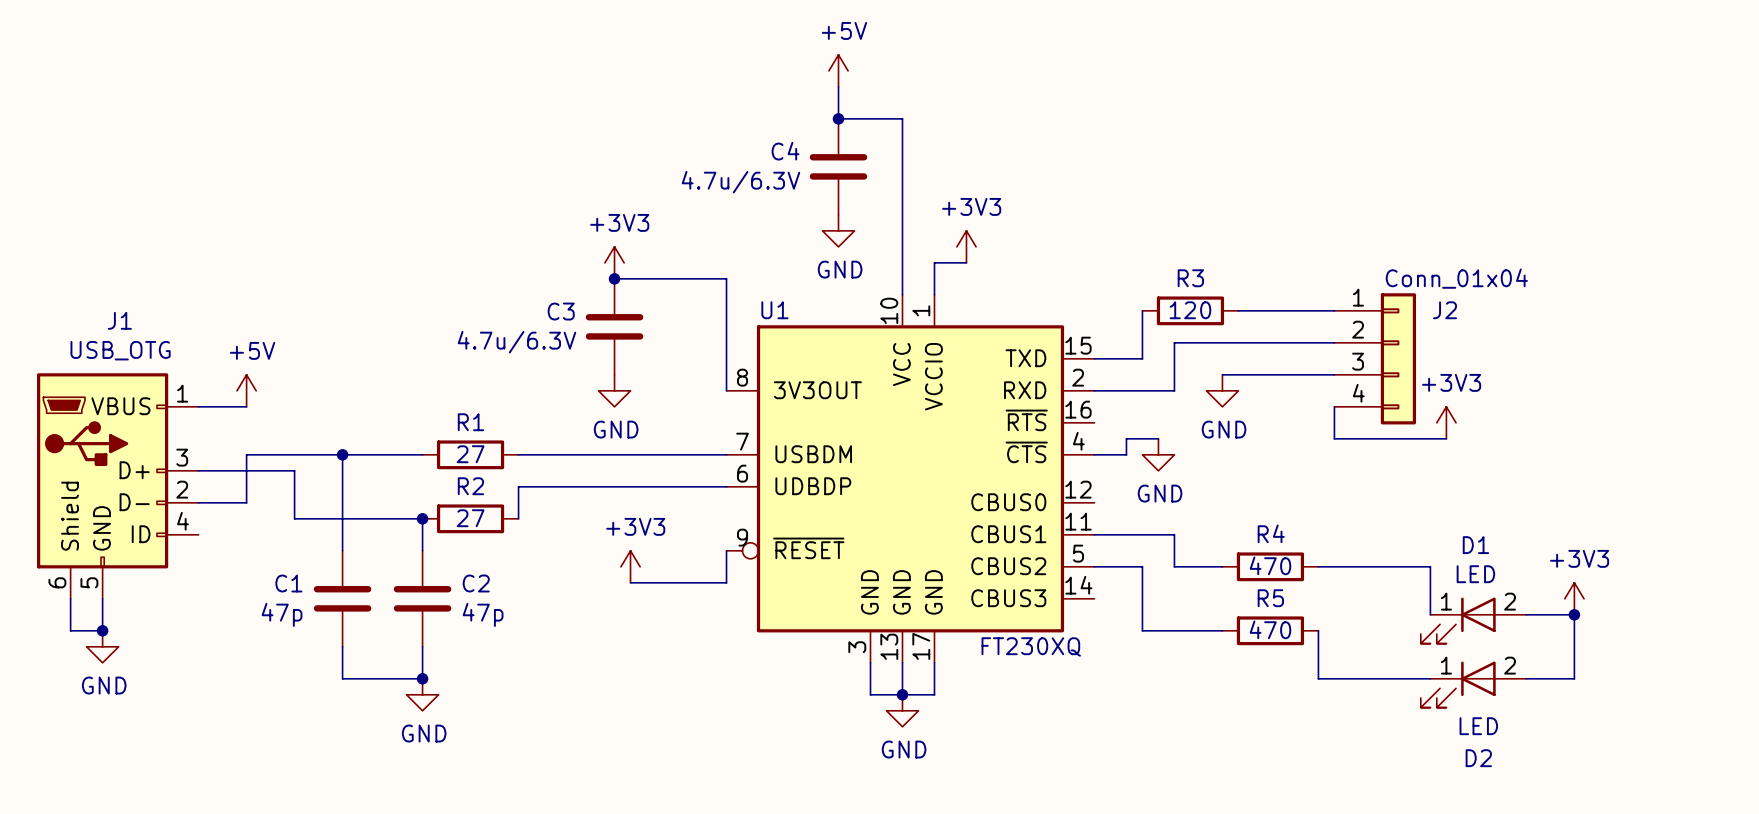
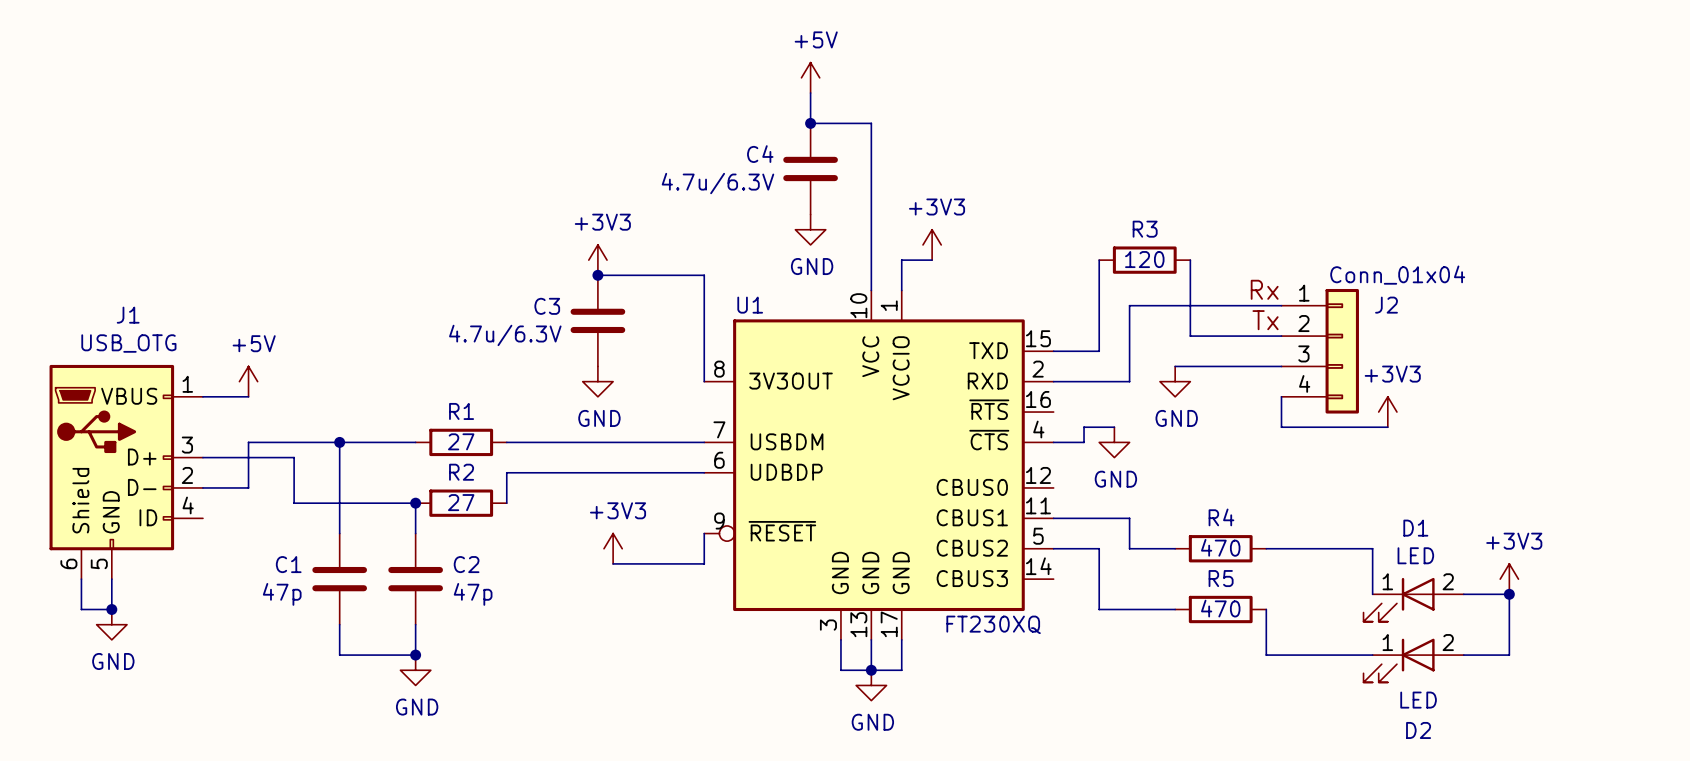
wire: none -> (1099, 260) (1099, 305)
wire: none -> (1190, 260) (1190, 336)
label: none -> Rx (1264, 289)
R3 position: (1190, 310) -> (1144, 260)
label: none -> Tx (1265, 320)
wire: (1174, 342) (1238, 342) -> (1129, 336) (1129, 305) (1190, 305)

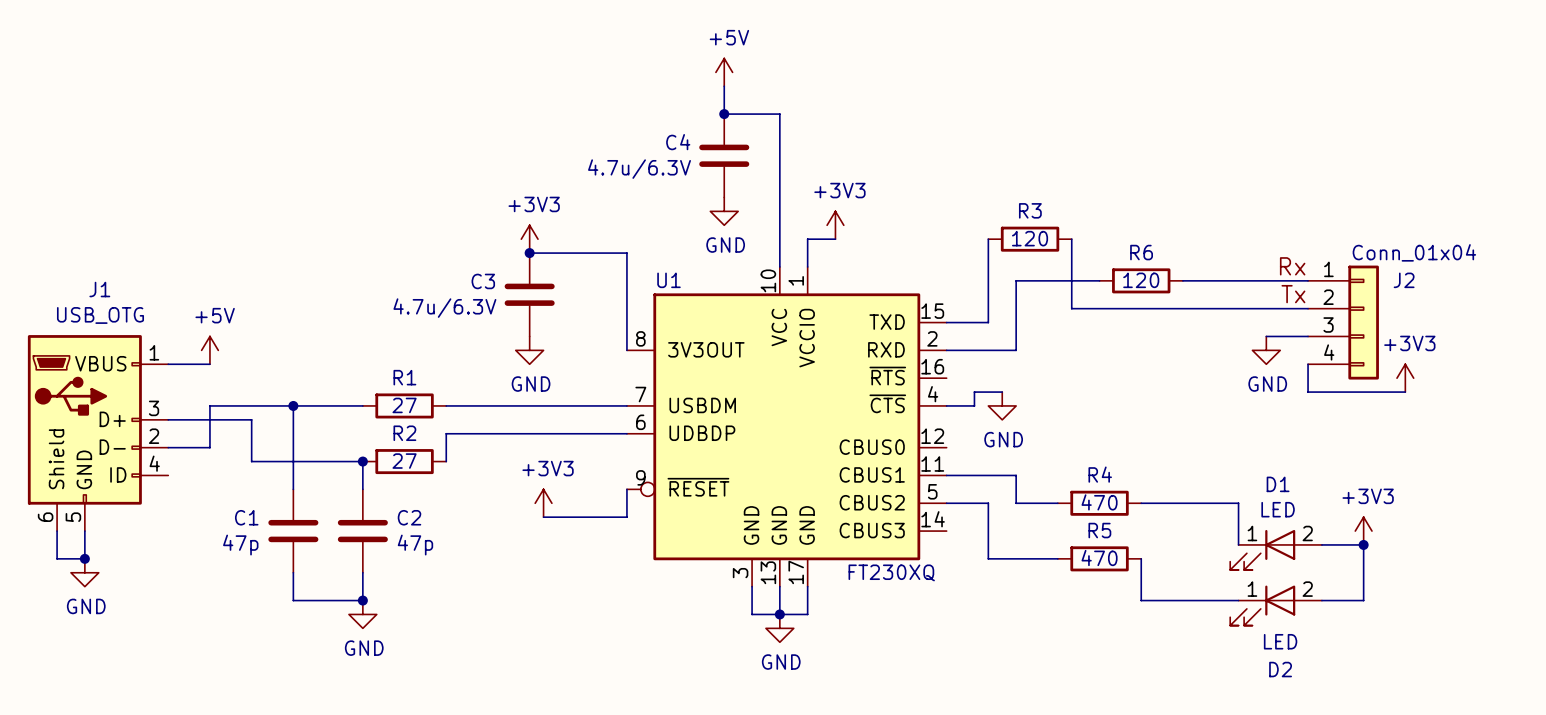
label position: Rx (1264, 289) -> Rx (1292, 266)
wire: (1220, 305) (1281, 305) -> none
R6: none -> 120 (1141, 280)
wire: none -> (1182, 280) (1308, 280)
label position: Tx (1265, 320) -> Tx (1293, 294)
wire: none -> (1155, 308) (1308, 308)
J2 position: (1320, 351) -> (1343, 322)
wire: (1175, 366) (1281, 366) -> none
wire: none -> (1266, 336) (1308, 336)
power symbol position: GND (1175, 381) -> GND (1266, 350)
wire: (1281, 396) (1281, 427) (1387, 427) -> (1308, 364) (1308, 392) (1405, 392)
power symbol position: +3V3 (1387, 412) -> +3V3 (1405, 378)

